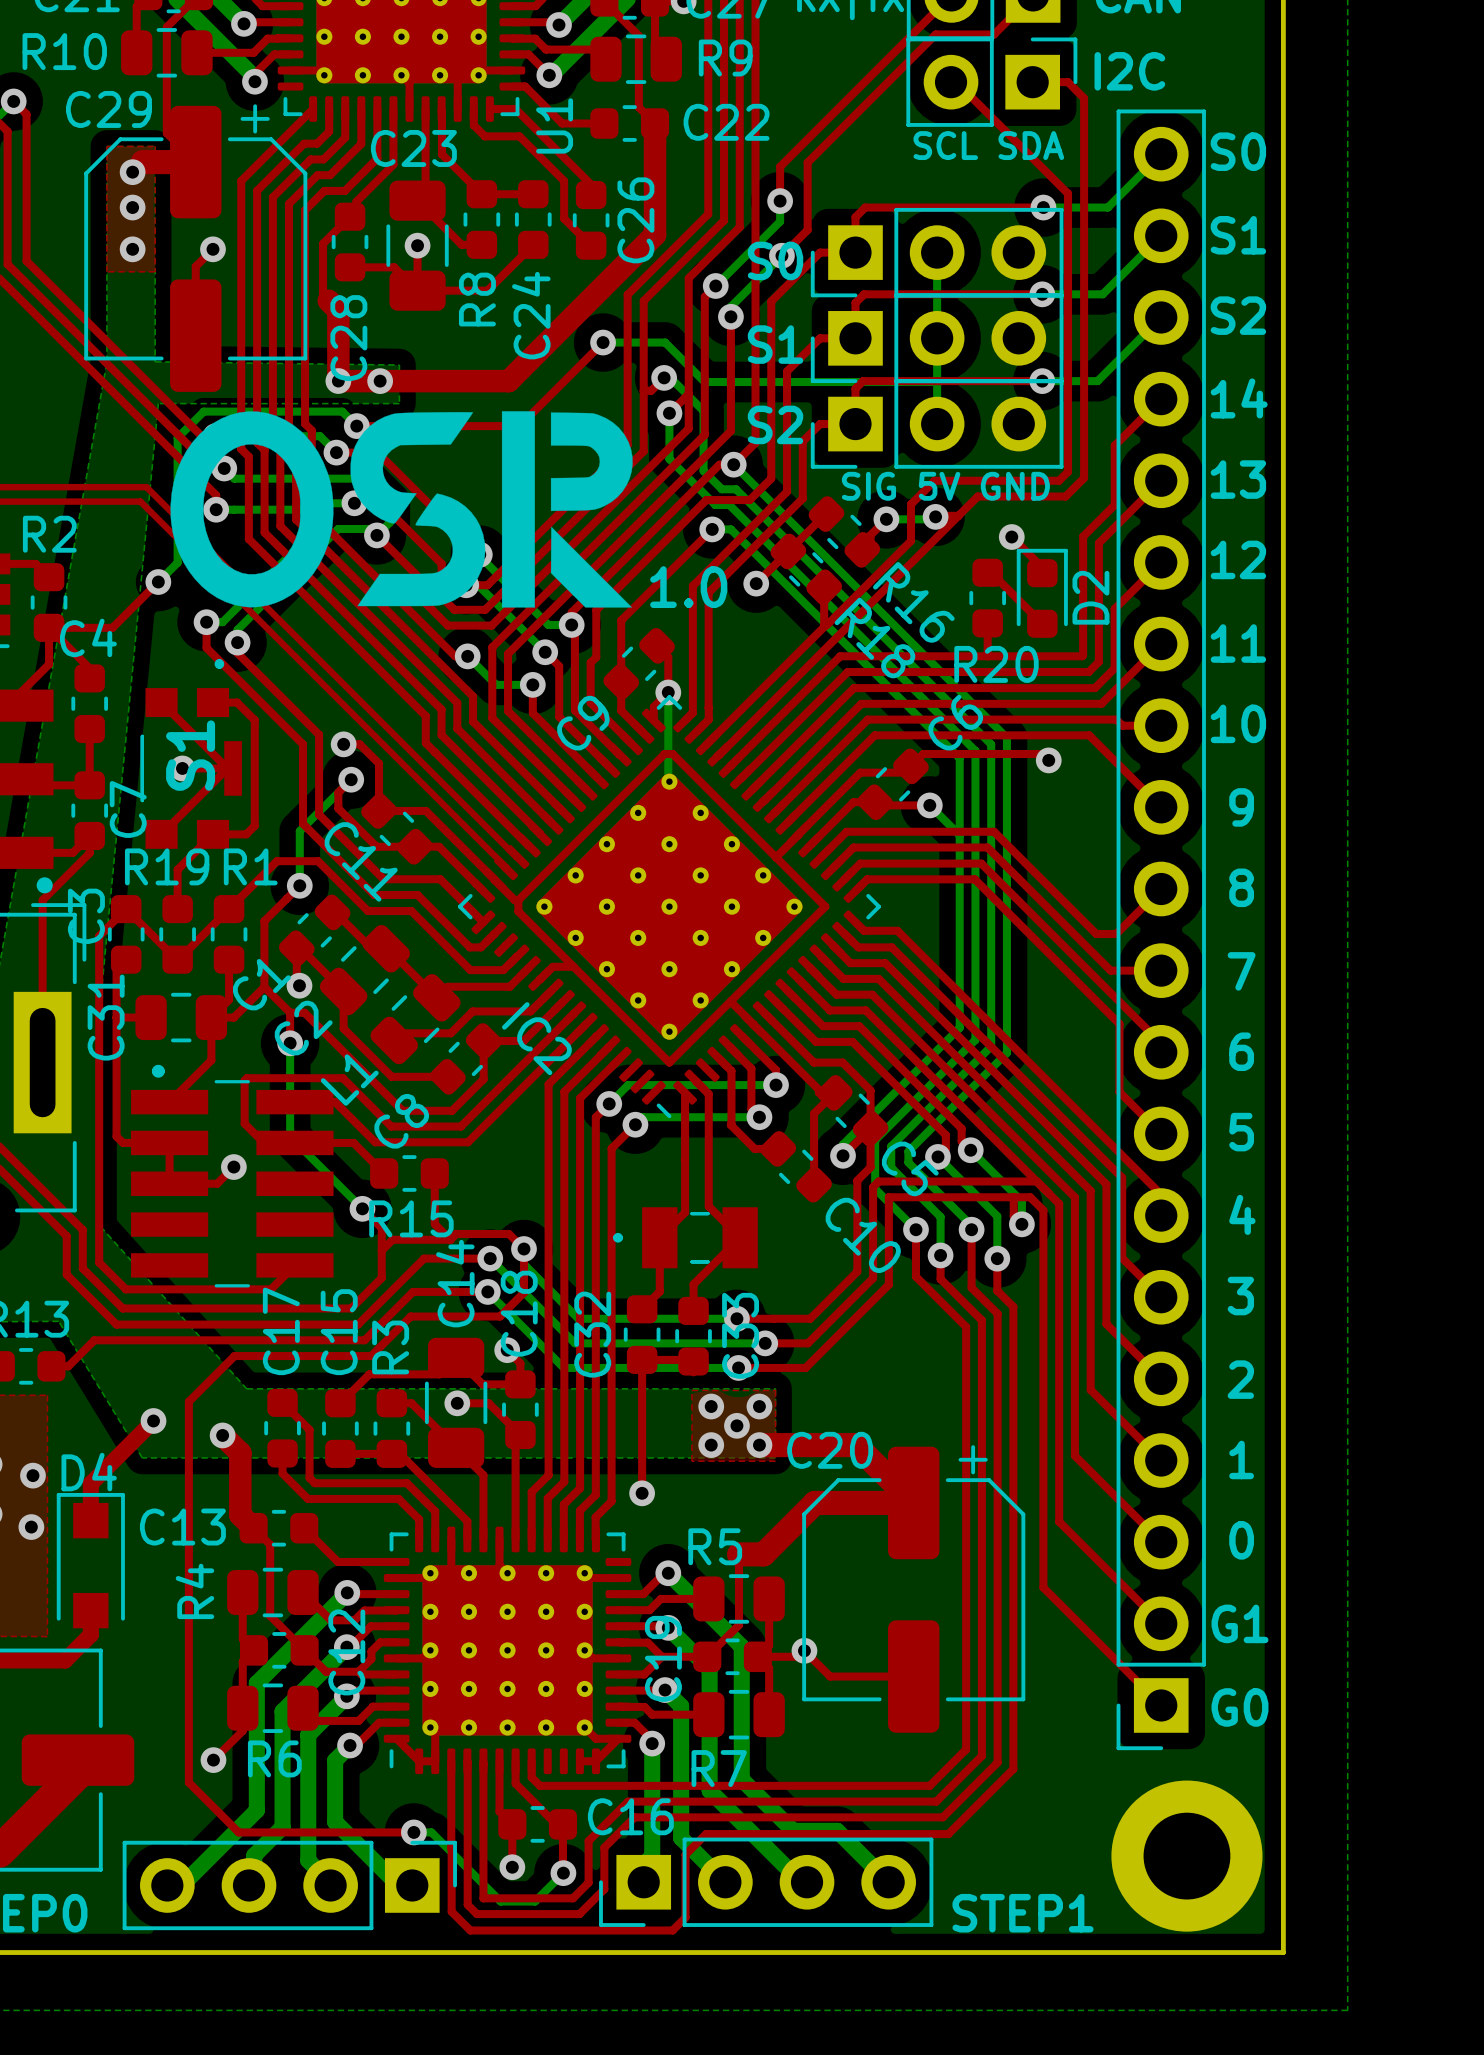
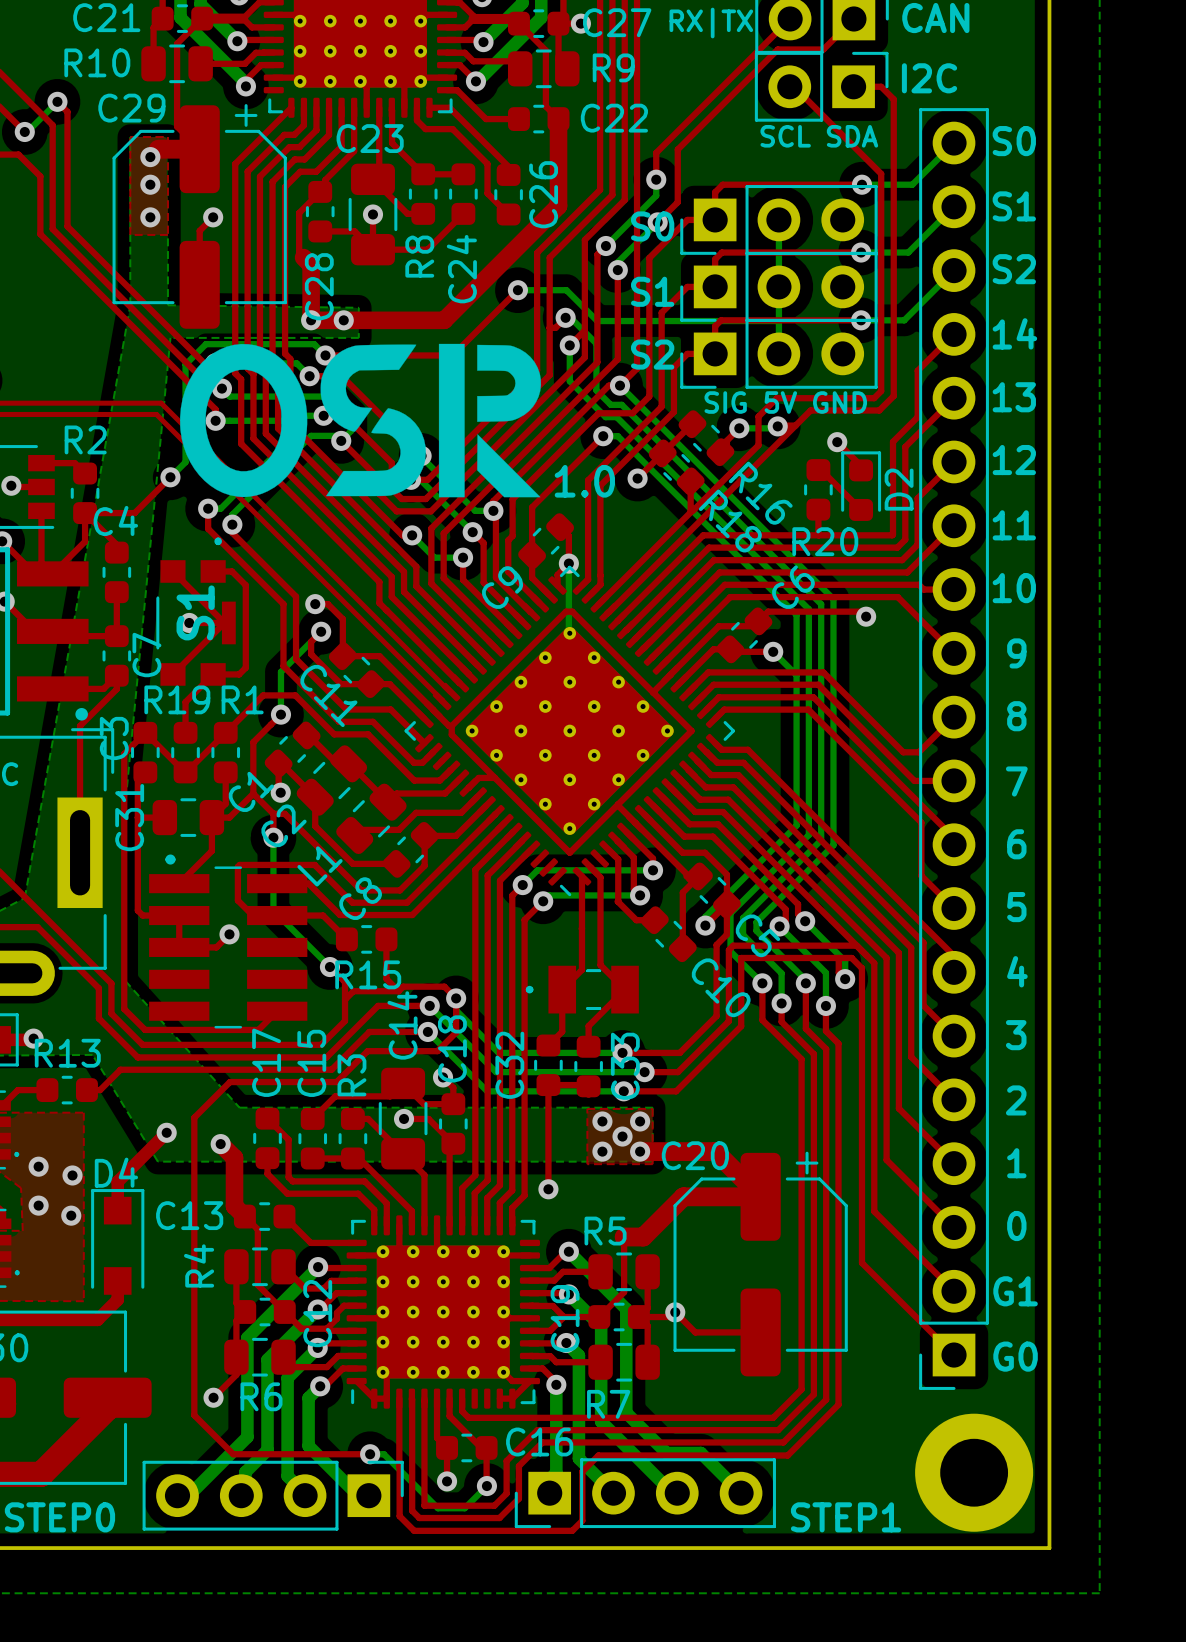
U1 name: U1 (554, 125) -> none
IC2 name: IC2 (536, 1038) -> none

